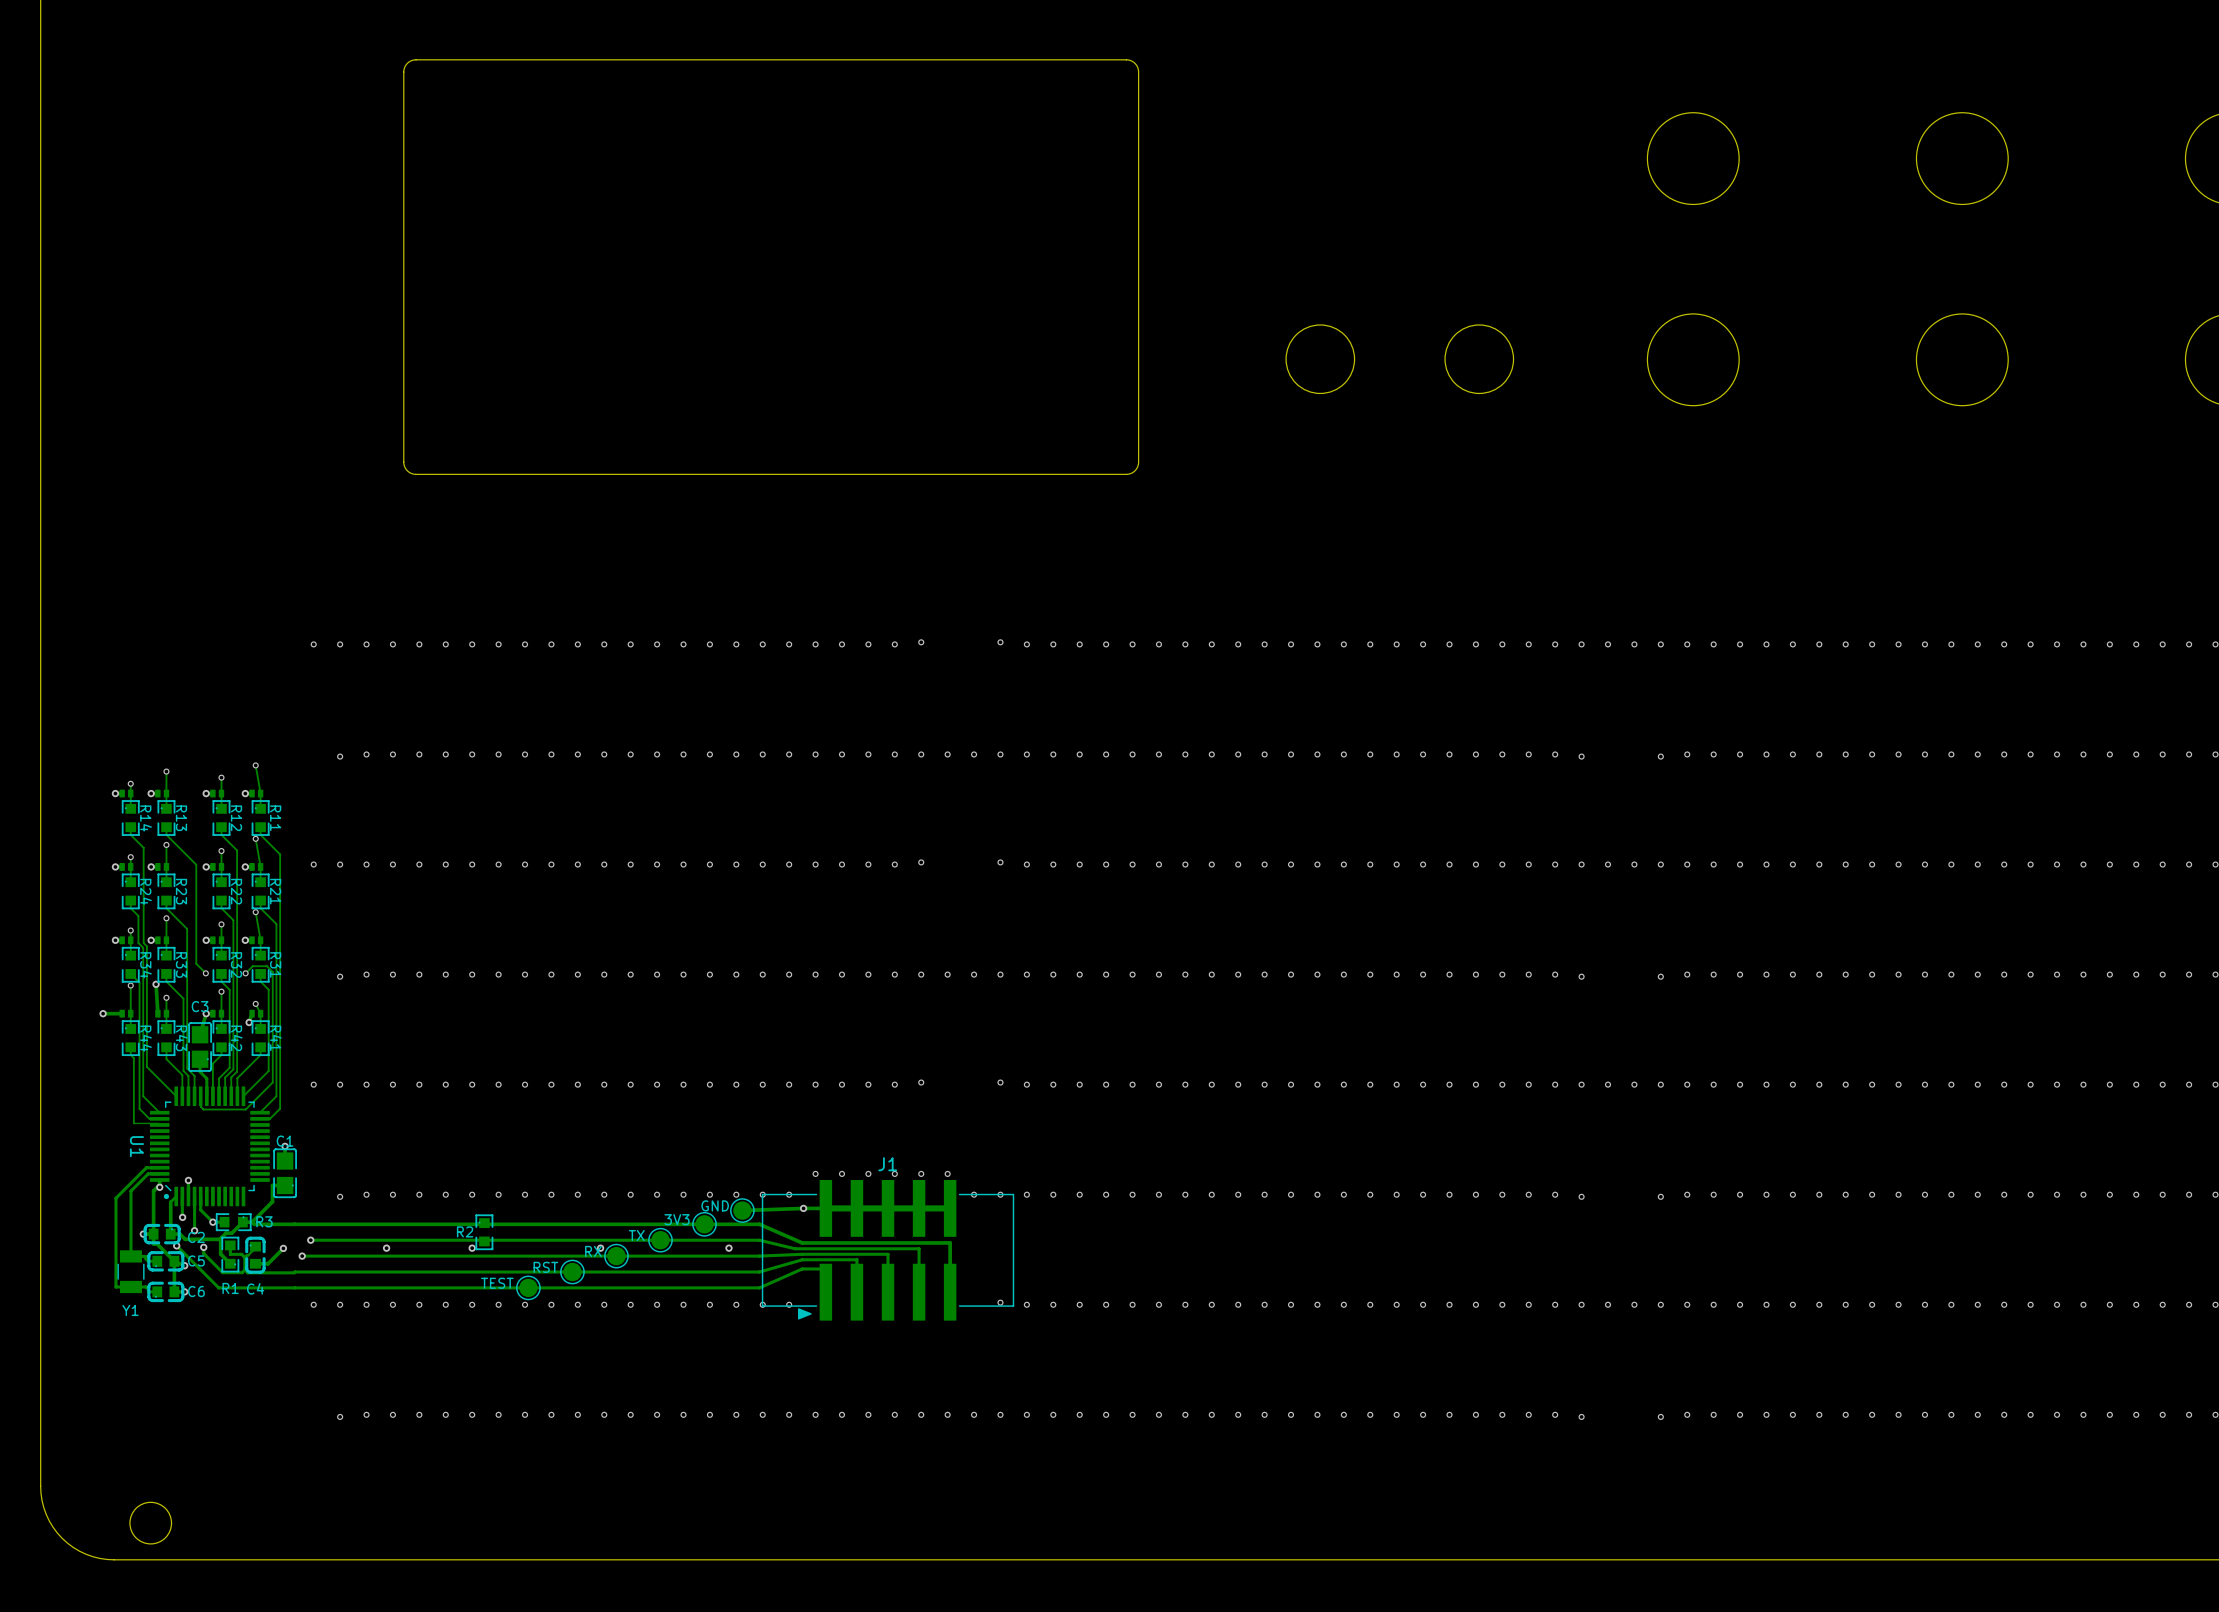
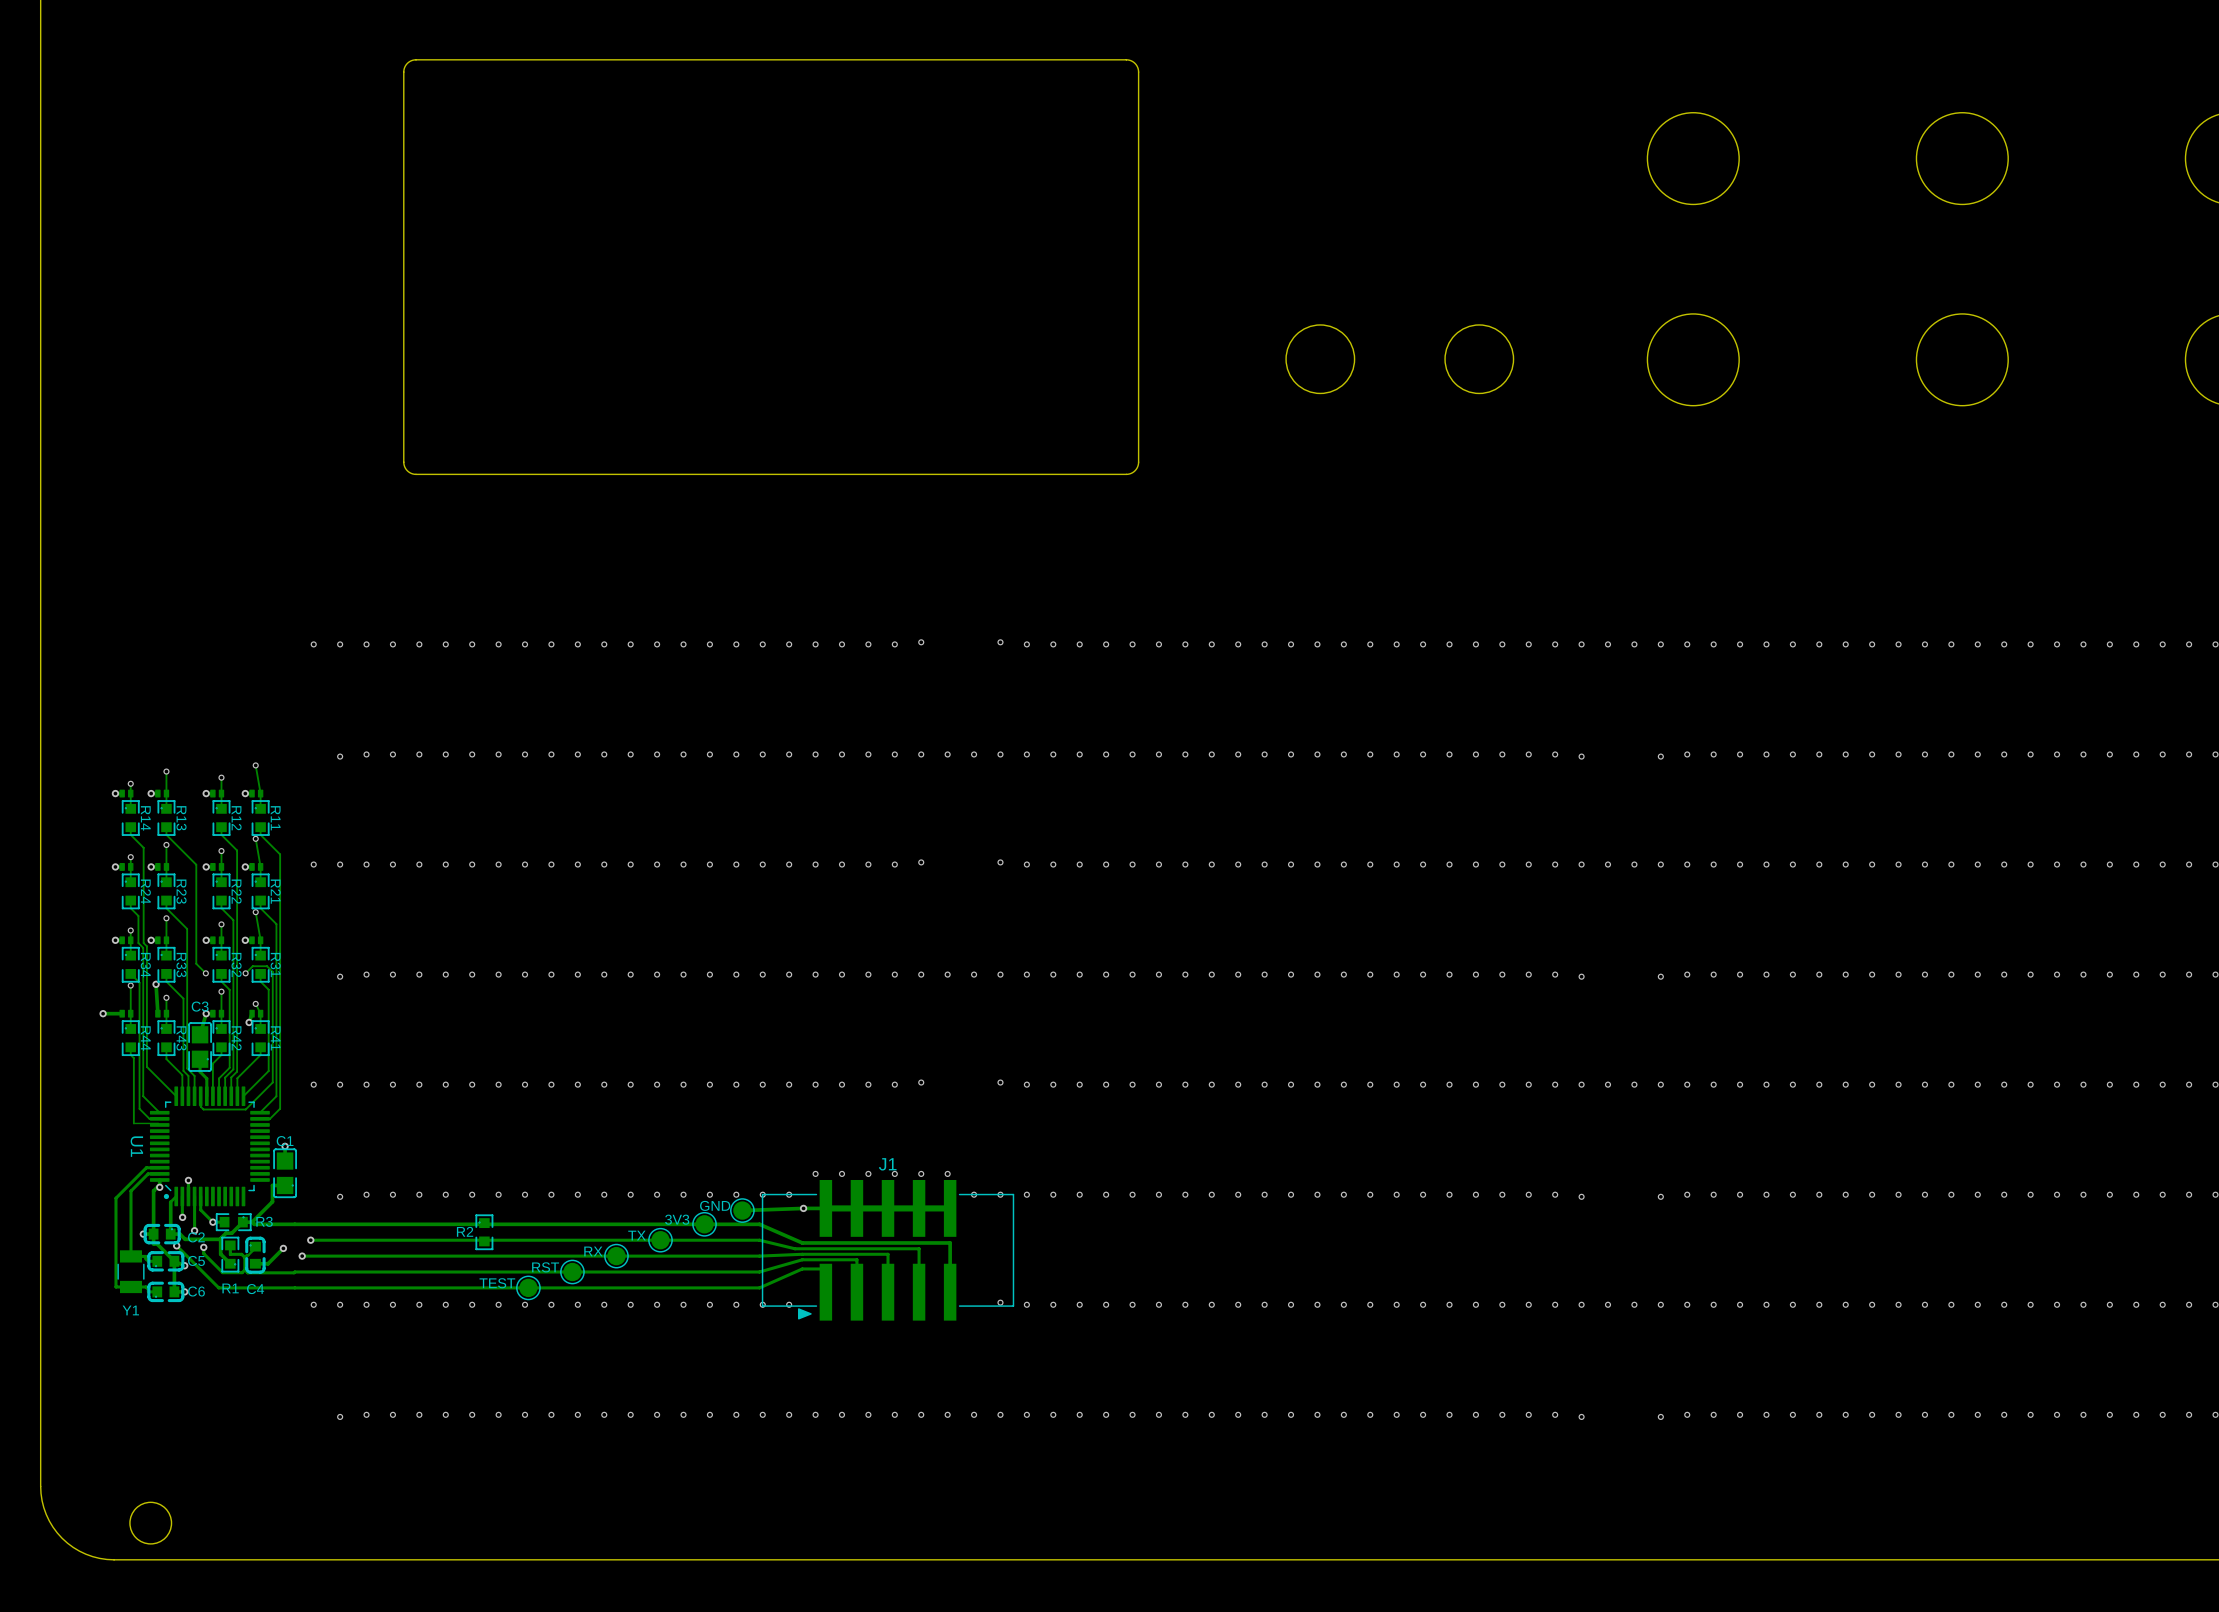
via: (386, 1248) -> none
via: (472, 1248) -> none
via: (600, 1248) -> none
via: (728, 1248) -> none

